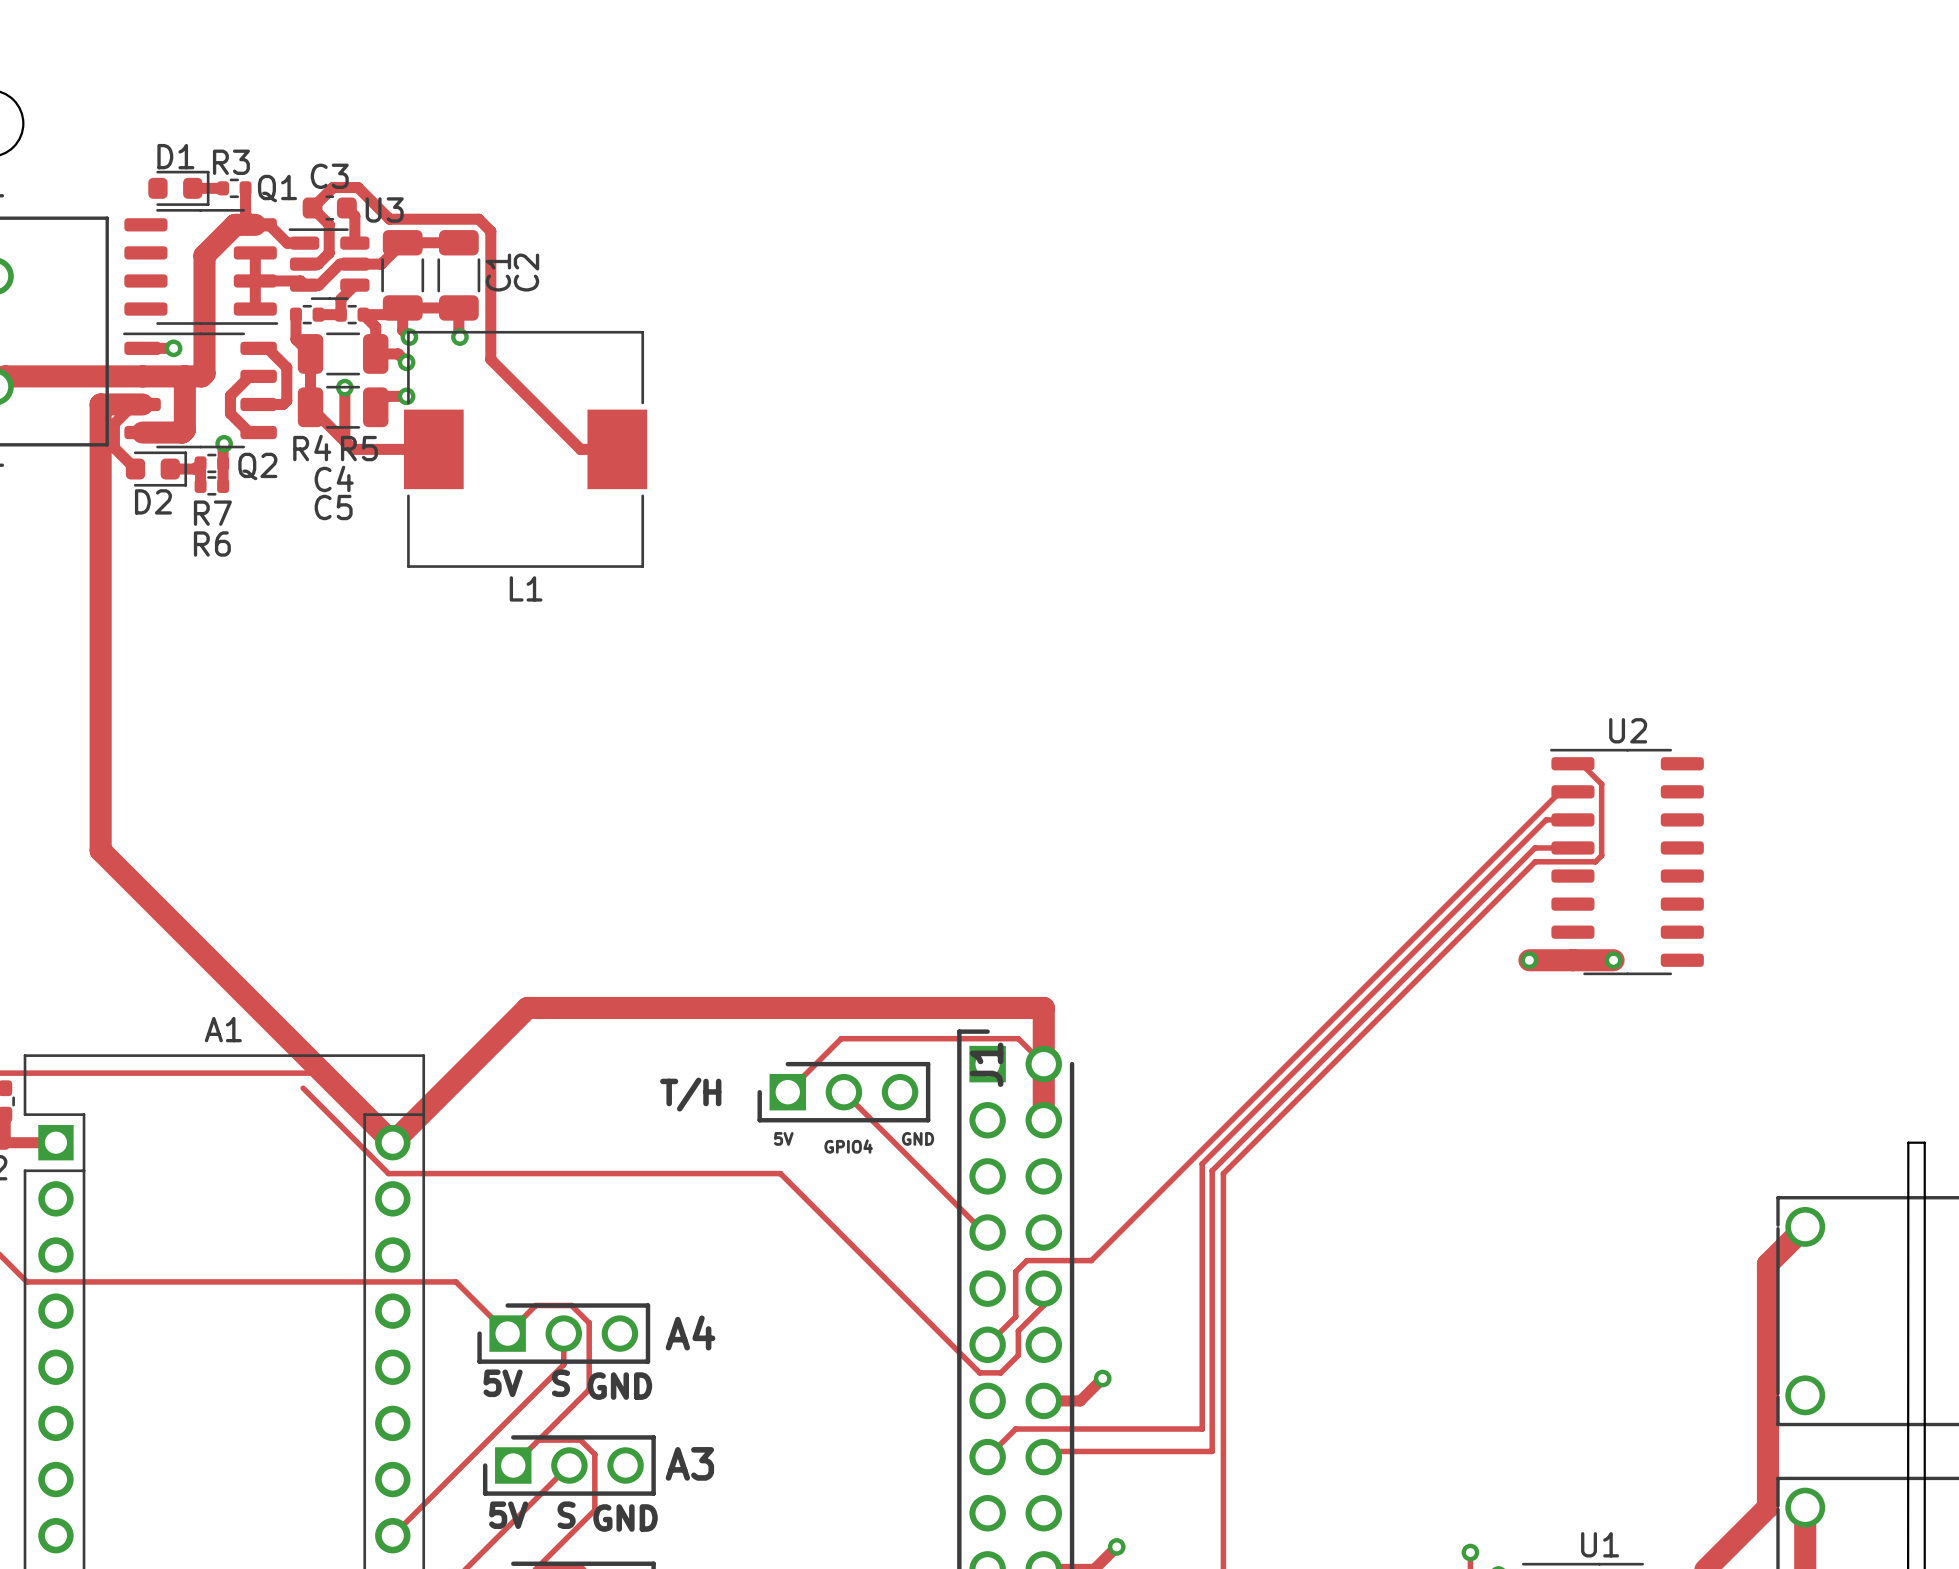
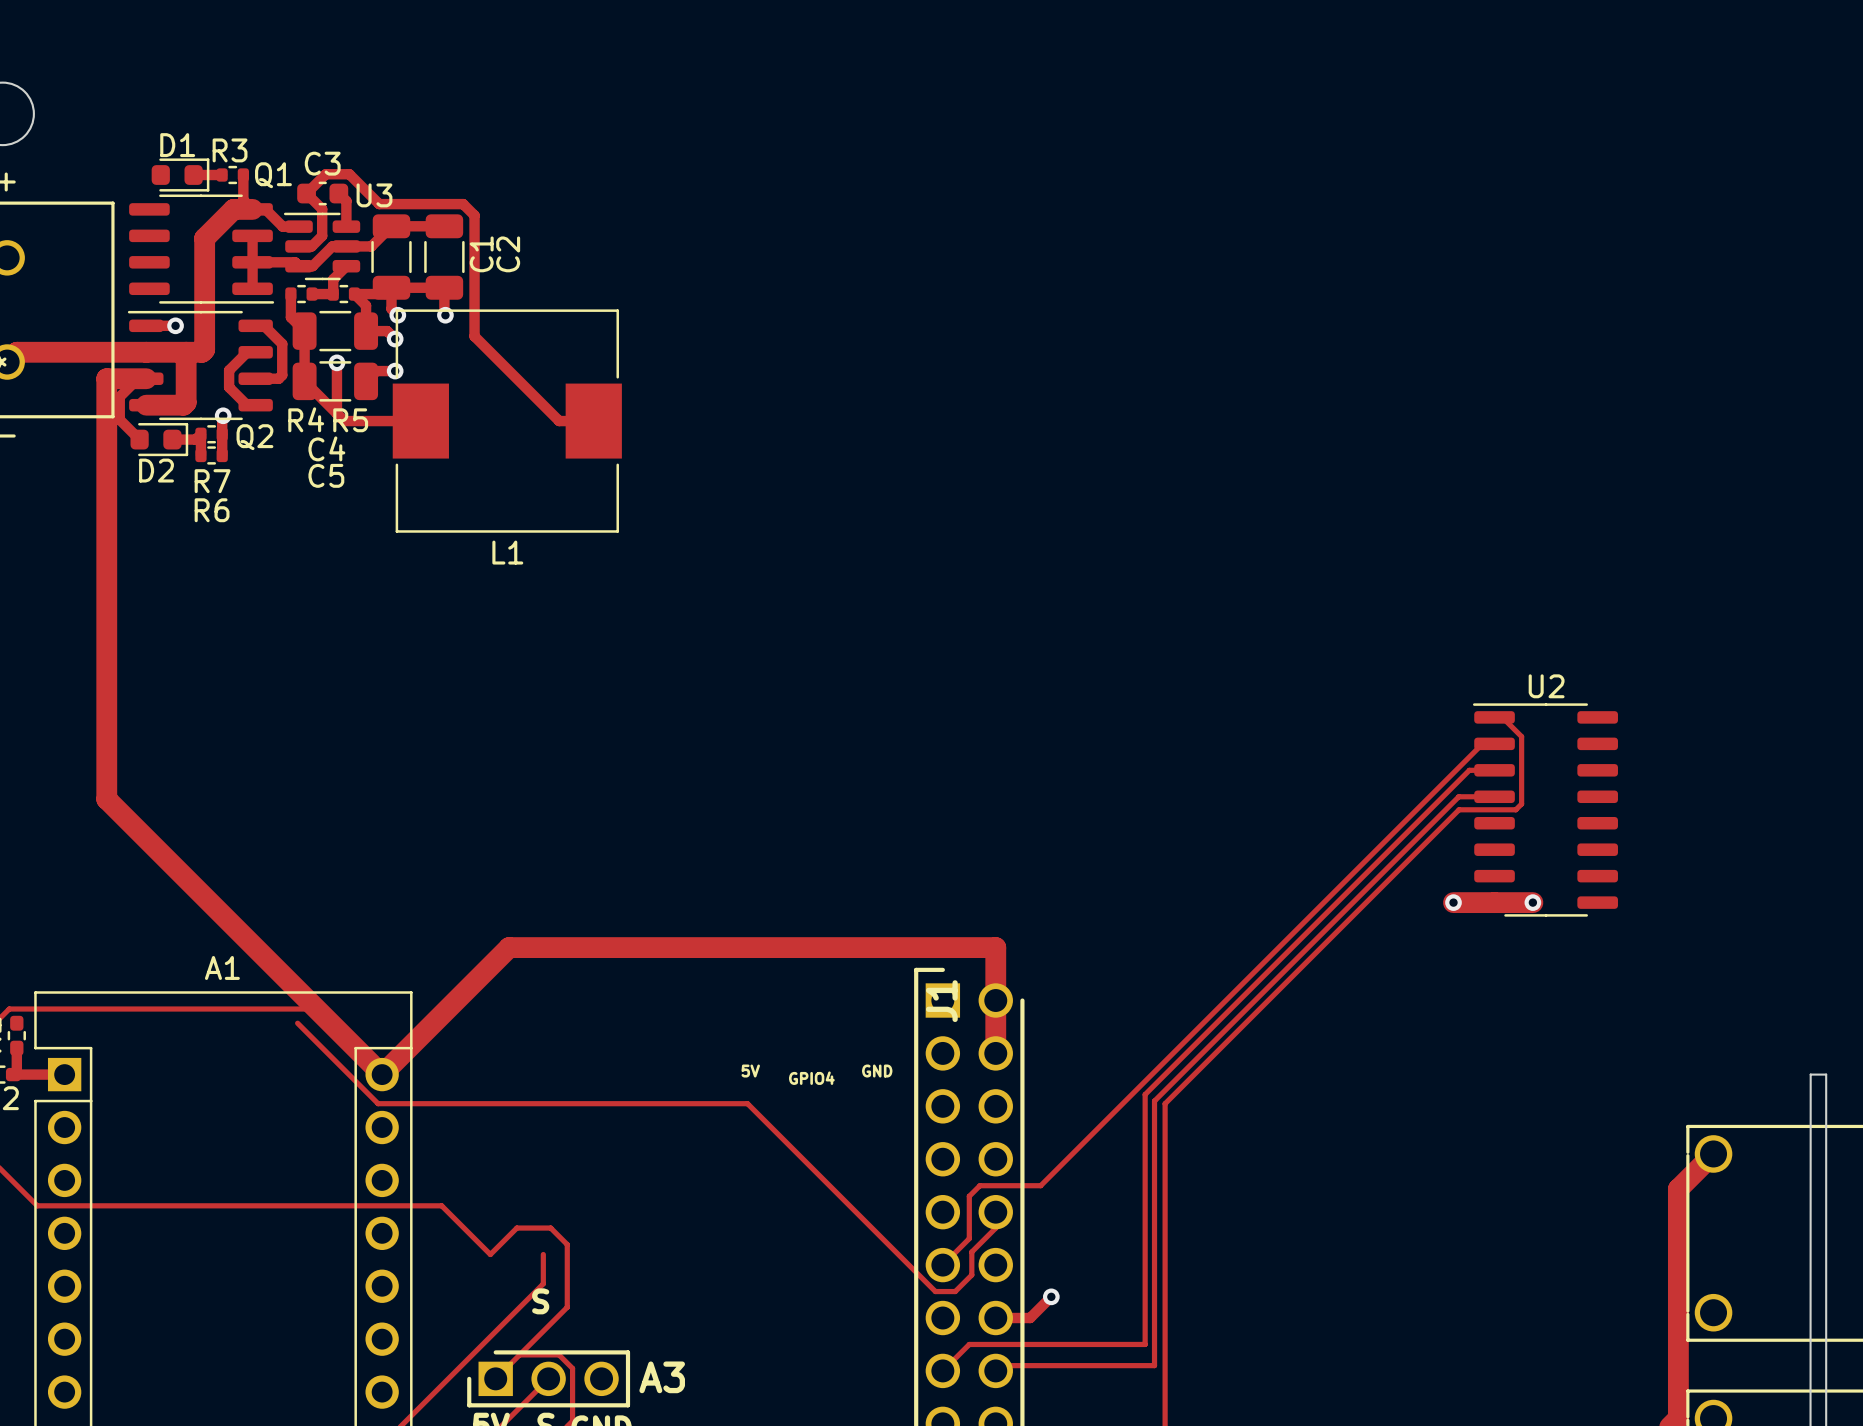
track: (1043, 1064) (1018, 1038) (841, 1038) (787, 1092) -> none
track: (843, 1092) (984, 1232) (987, 1232) -> none
T/H: (843, 1092) -> none
A4: (563, 1333) -> none
text: 5V (503, 1383) -> none
text: GND (619, 1386) -> none

